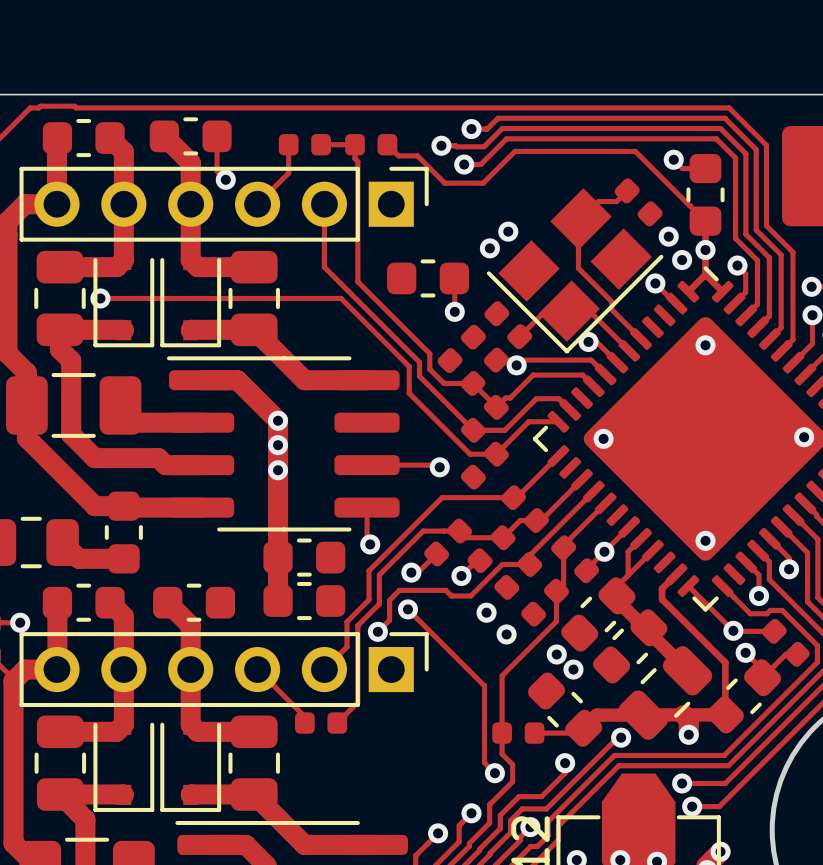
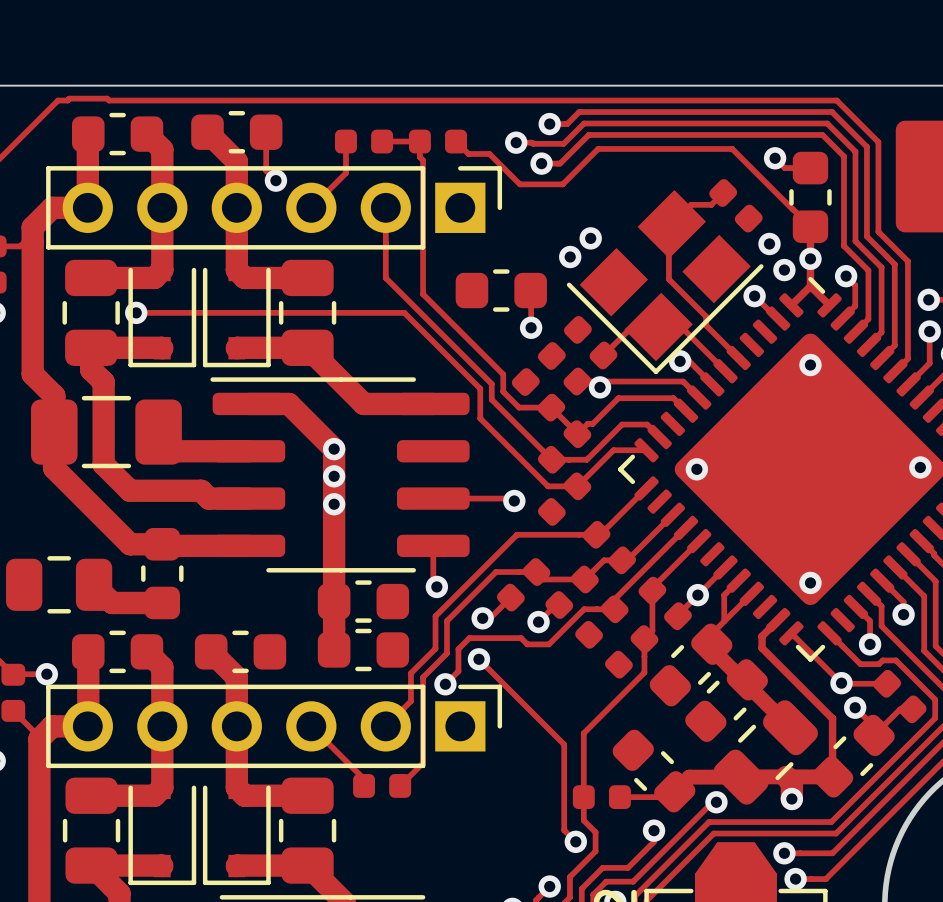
via: (486, 612) -> none
via: (506, 634) -> none
via: (556, 654) -> none
via: (573, 669) -> none

